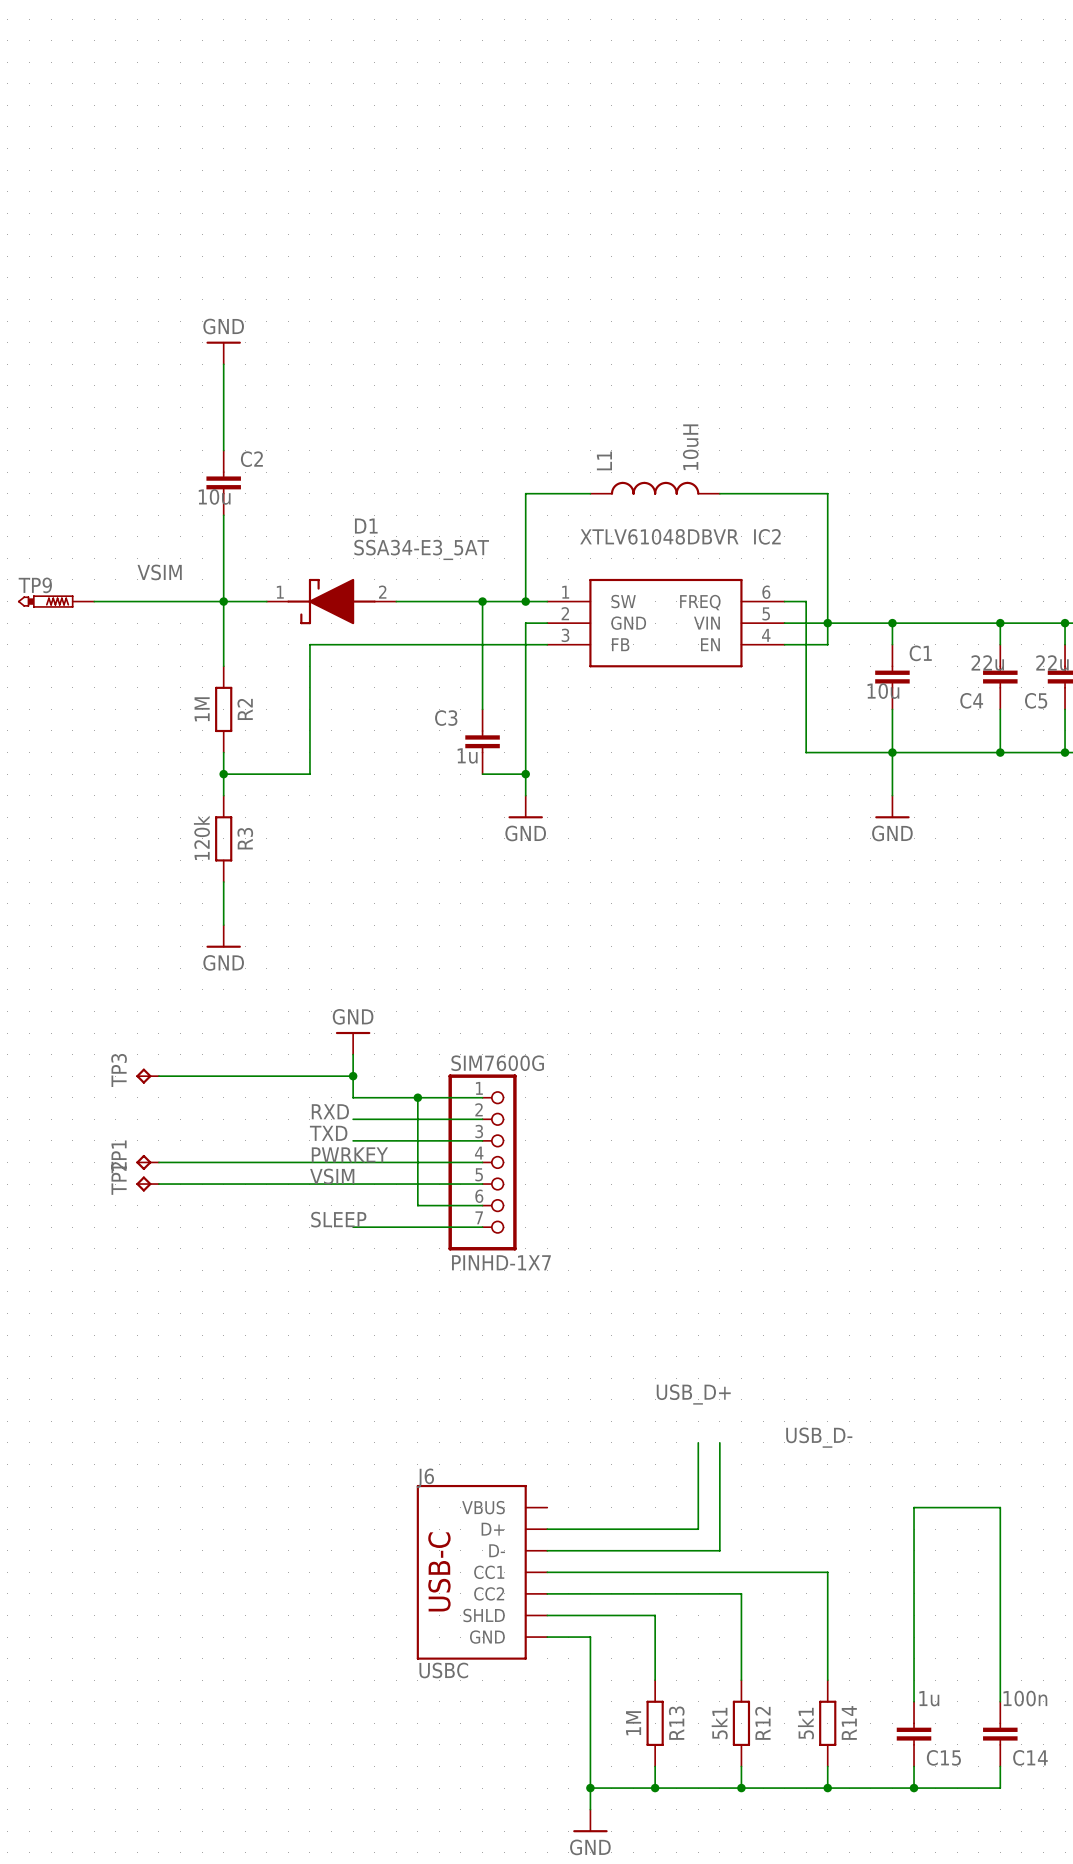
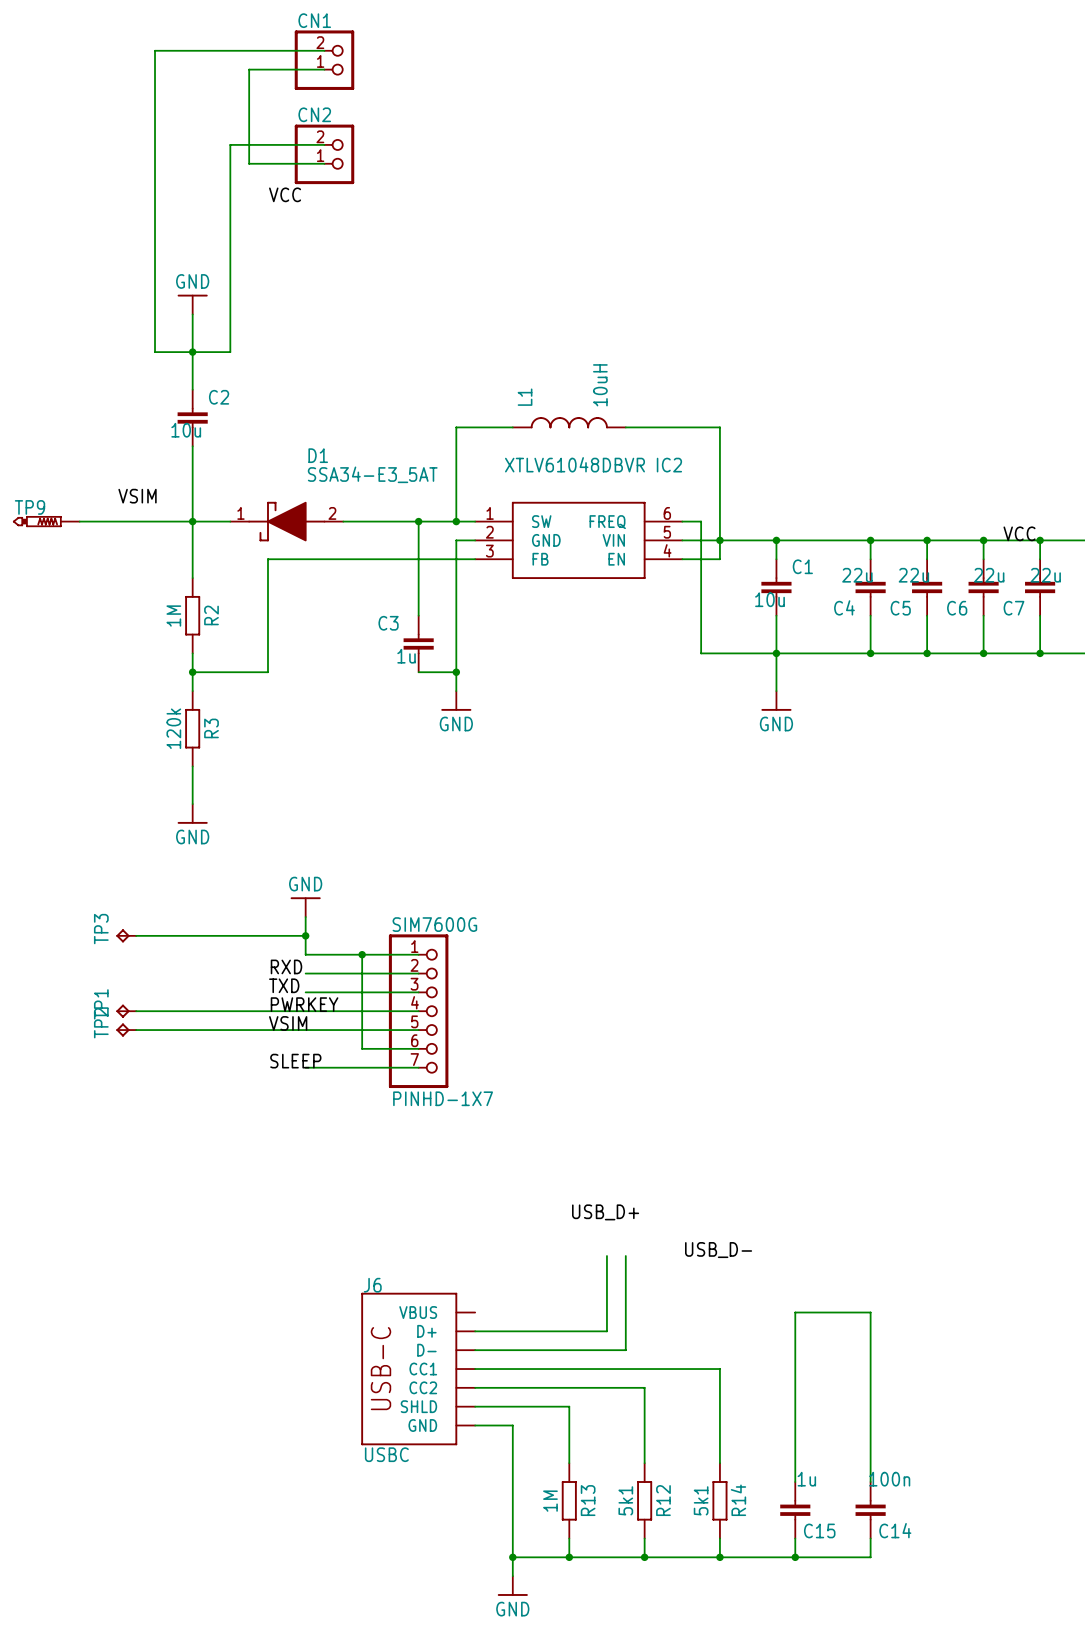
wire: none -> (324, 50) (155, 50) (155, 352) (230, 352) (230, 144) (324, 144)
CN1: none -> (324, 60)
wire: none -> (324, 69) (249, 69) (249, 163) (324, 163)
CN2: none -> (324, 154)
label: none -> VCC (285, 194)
junction: none -> (192, 352)

